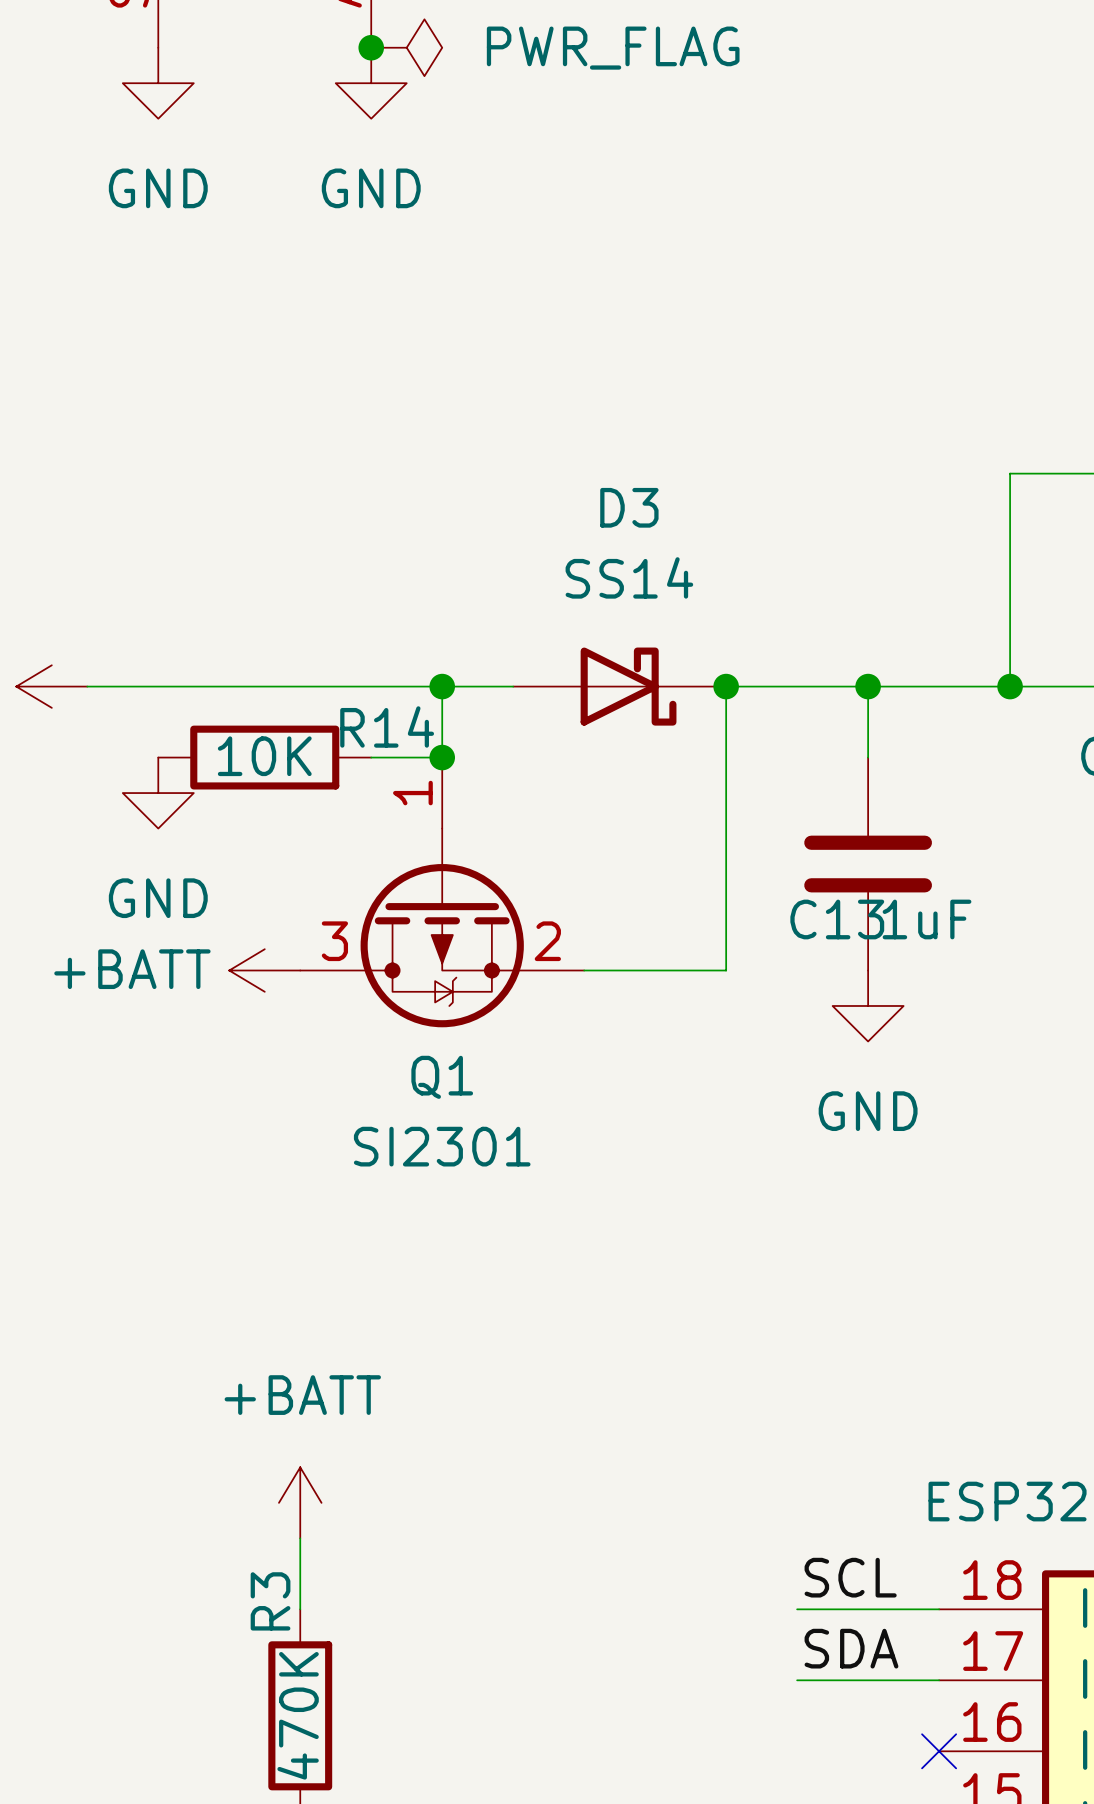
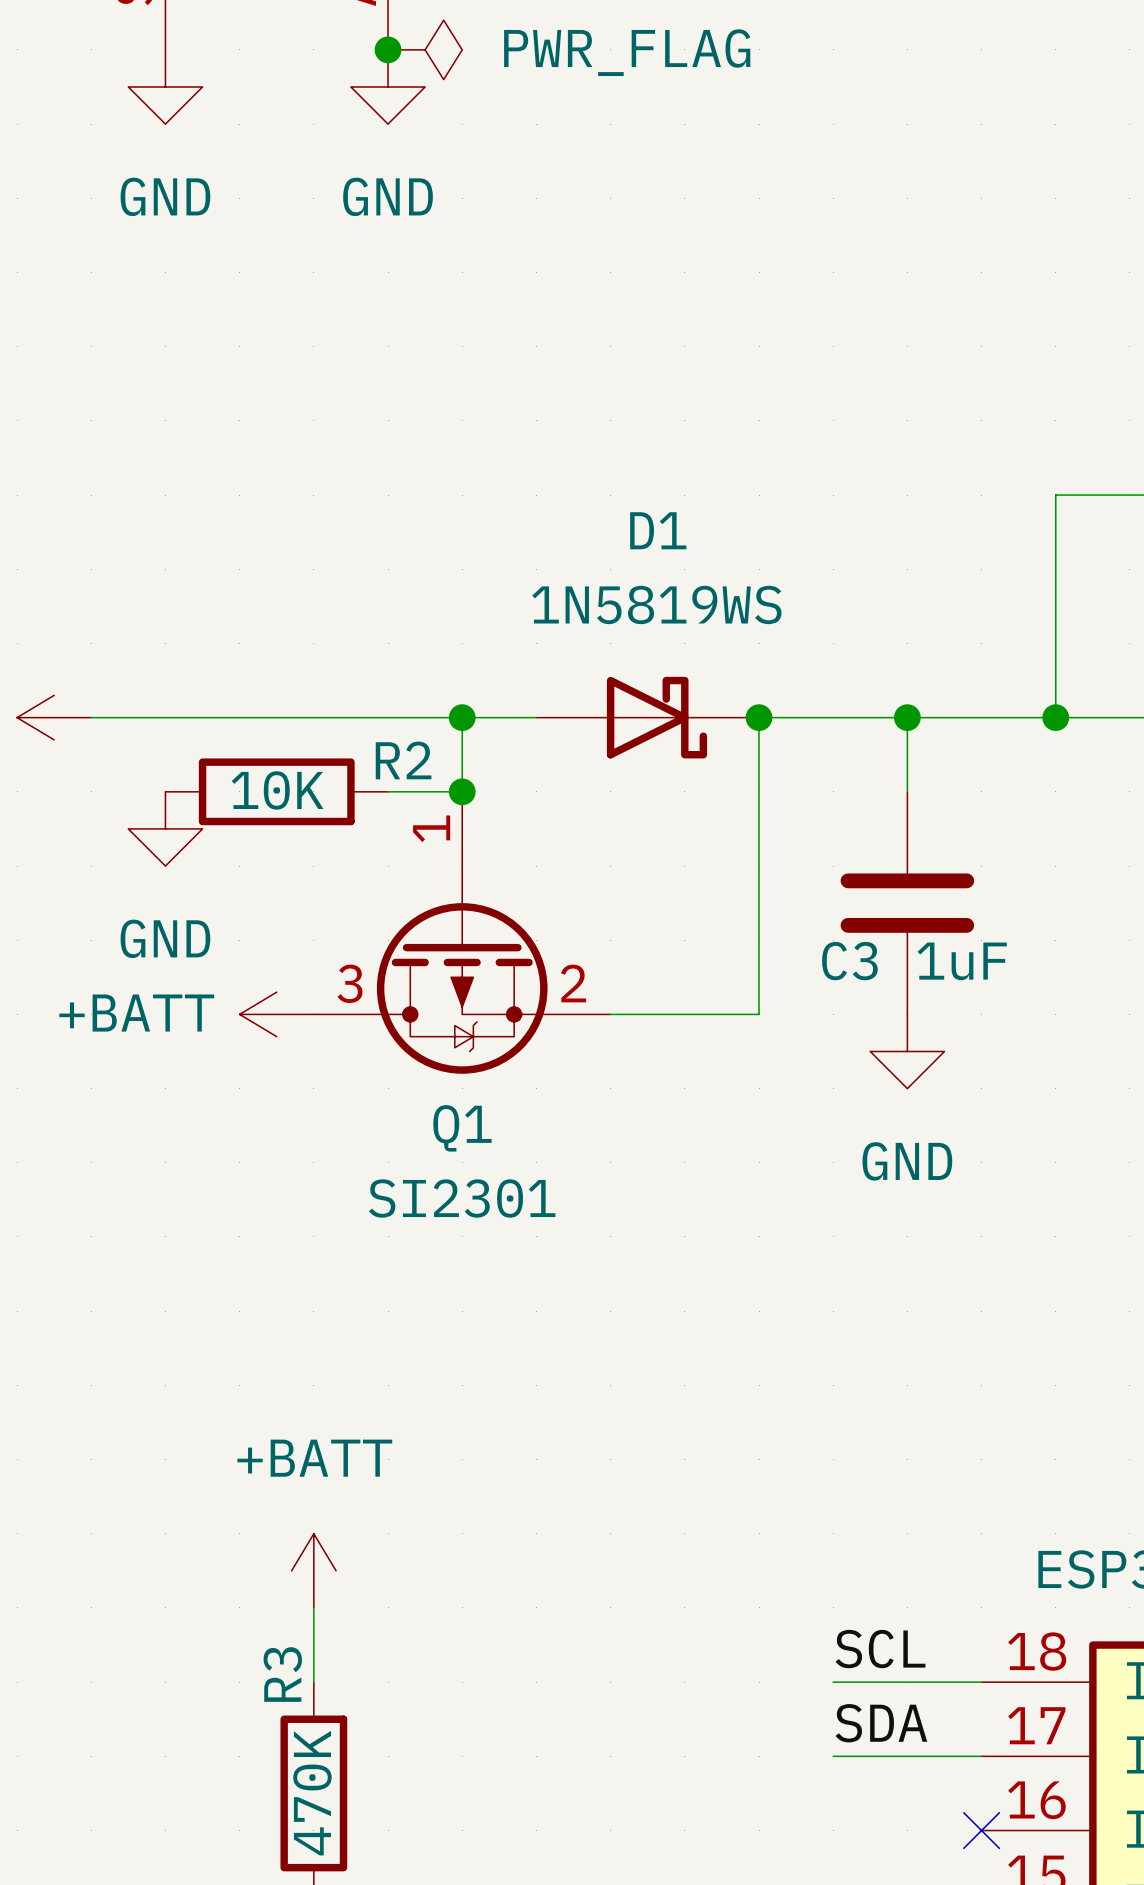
D3 name: D3 (629, 507) -> D1 (658, 530)
D3 value: SS14 (629, 577) -> 1N5819WS (656, 604)
R14 name: R14 (387, 726) -> R2 (403, 760)
C13 name: C13 (837, 919) -> C3 (849, 961)

